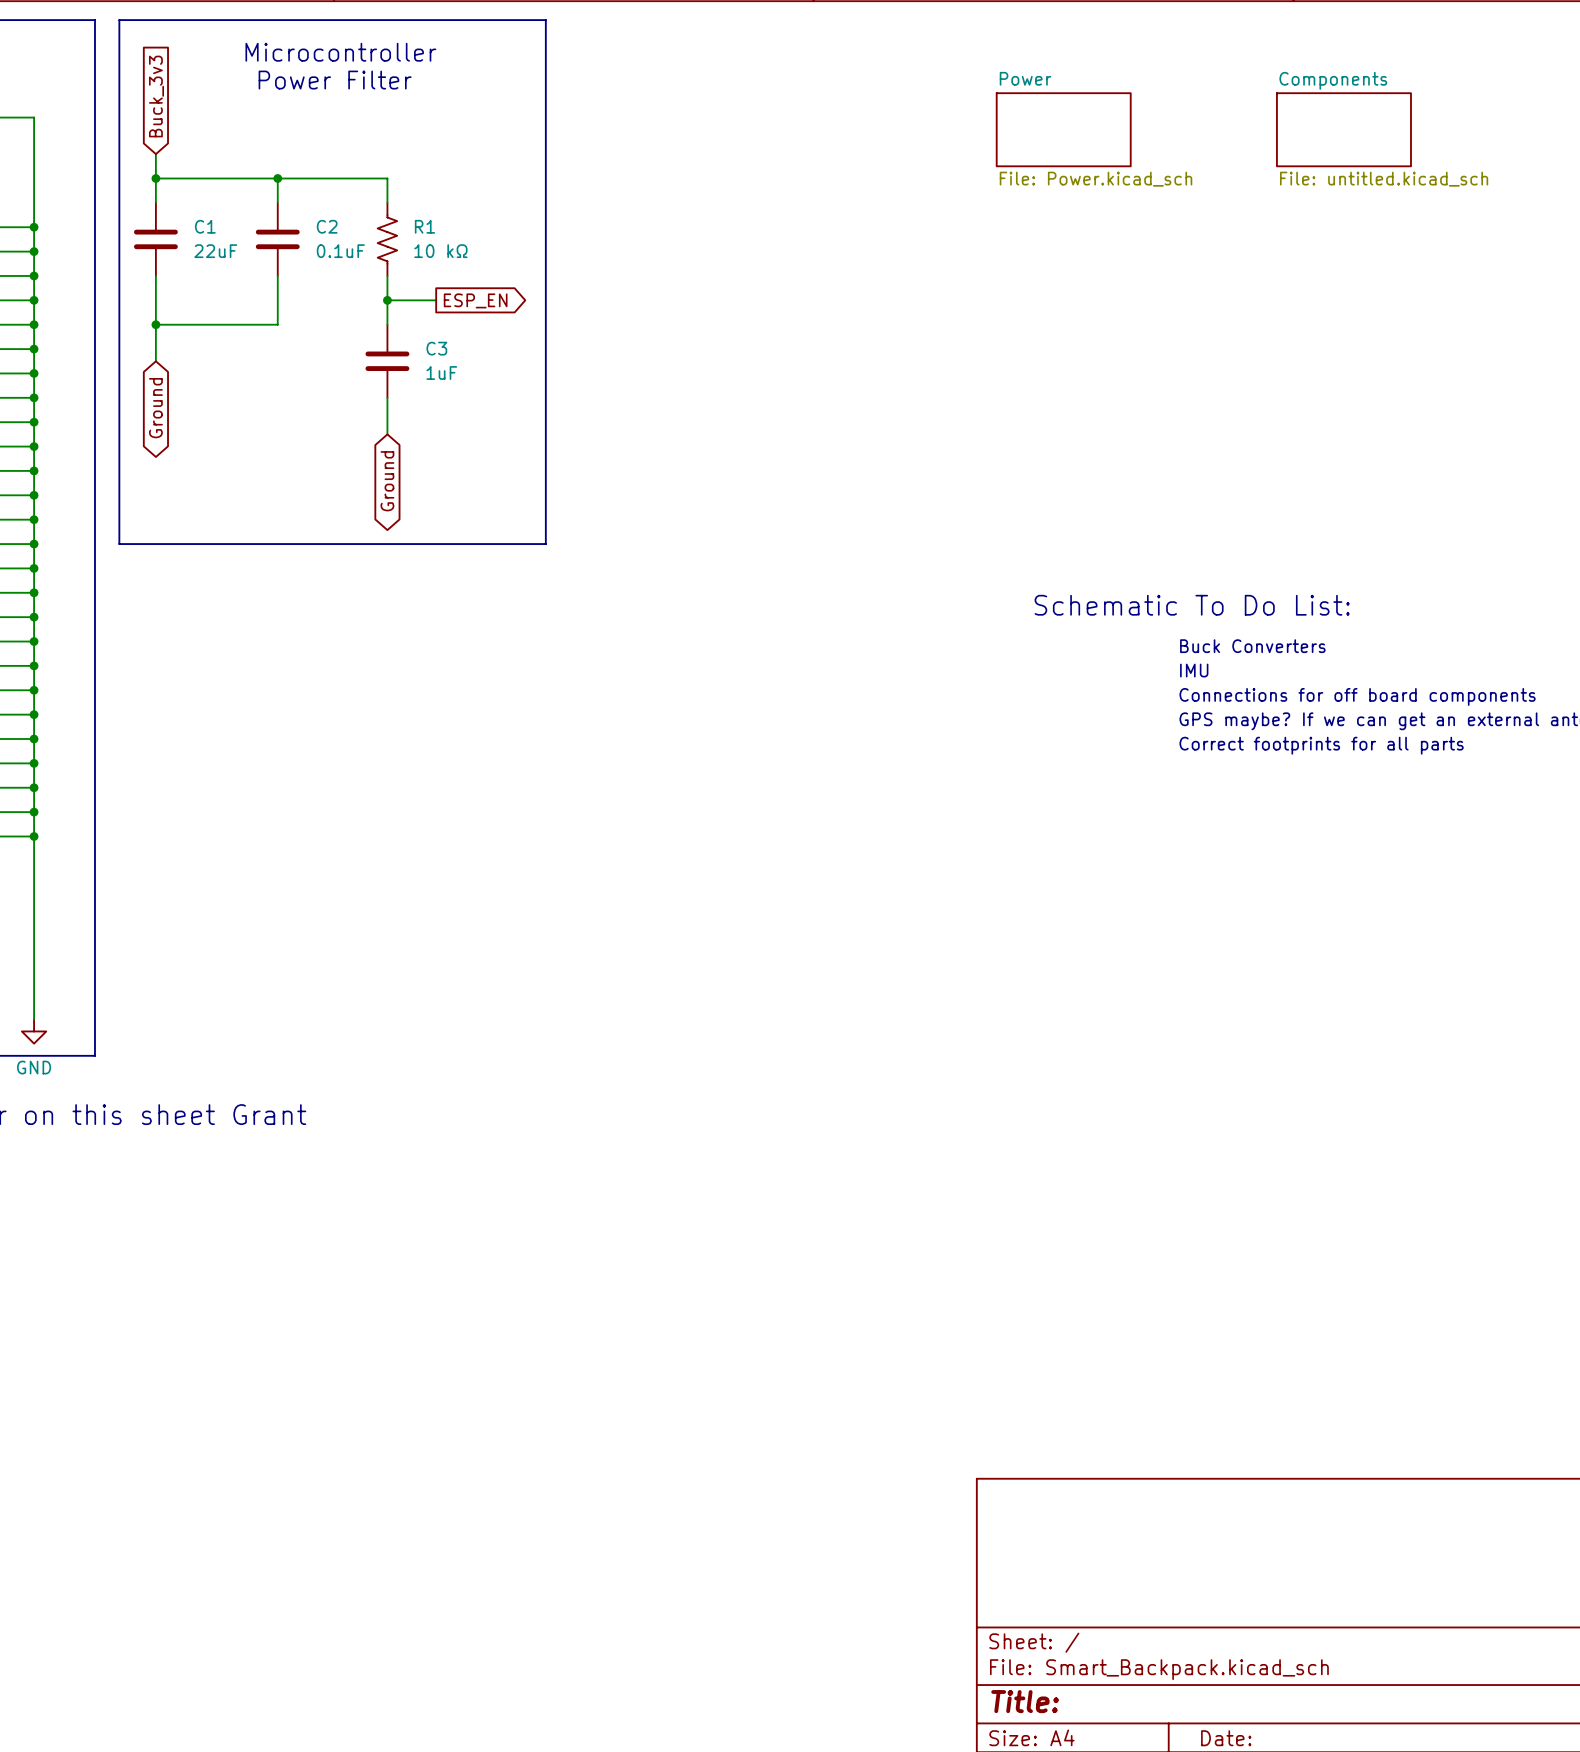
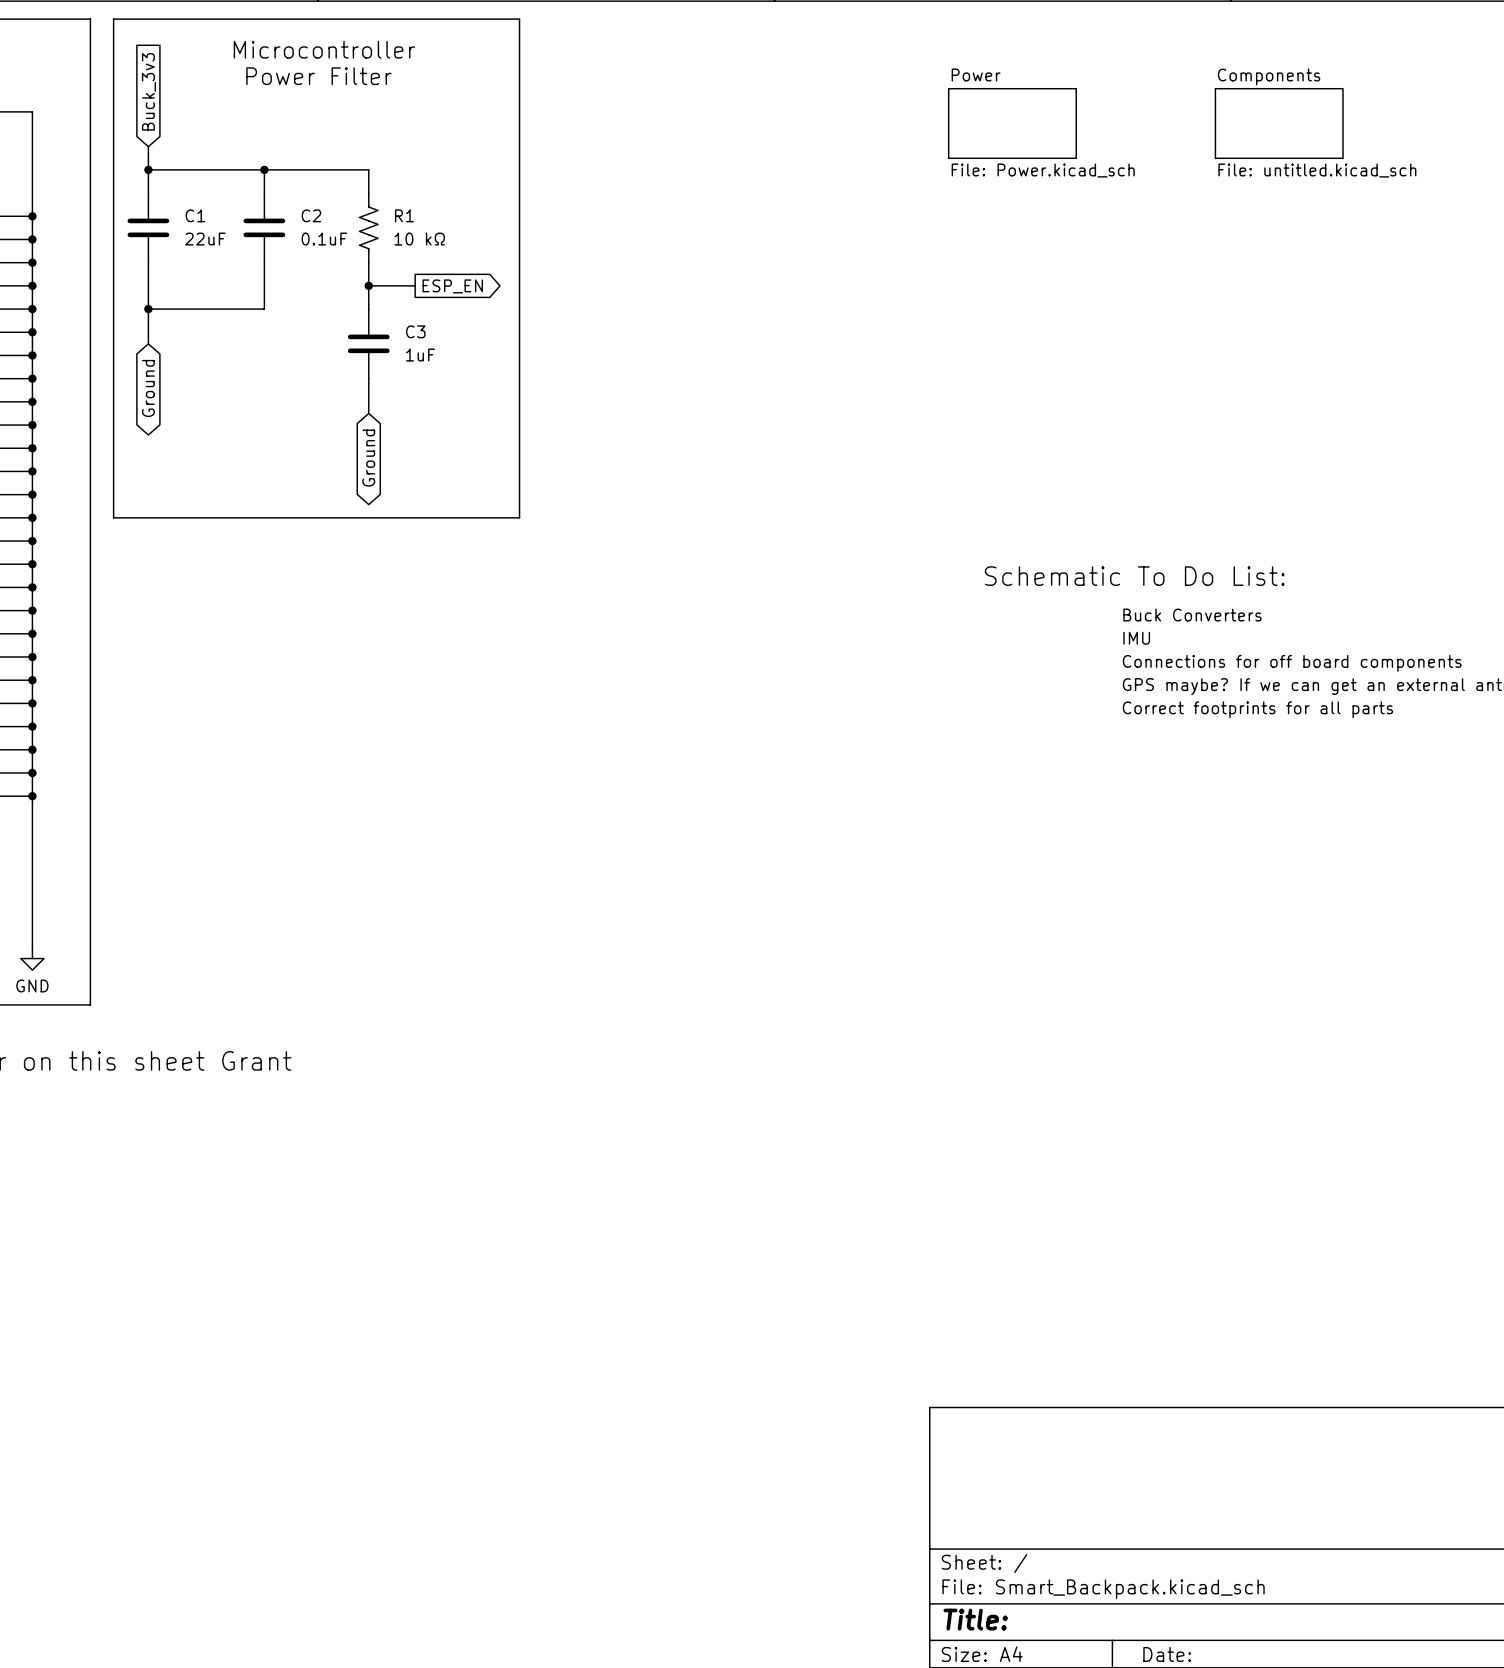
power symbol position: GND (34, 1031) -> GND (32, 958)
power symbol text position: GND (34, 1067) -> GND (32, 985)

